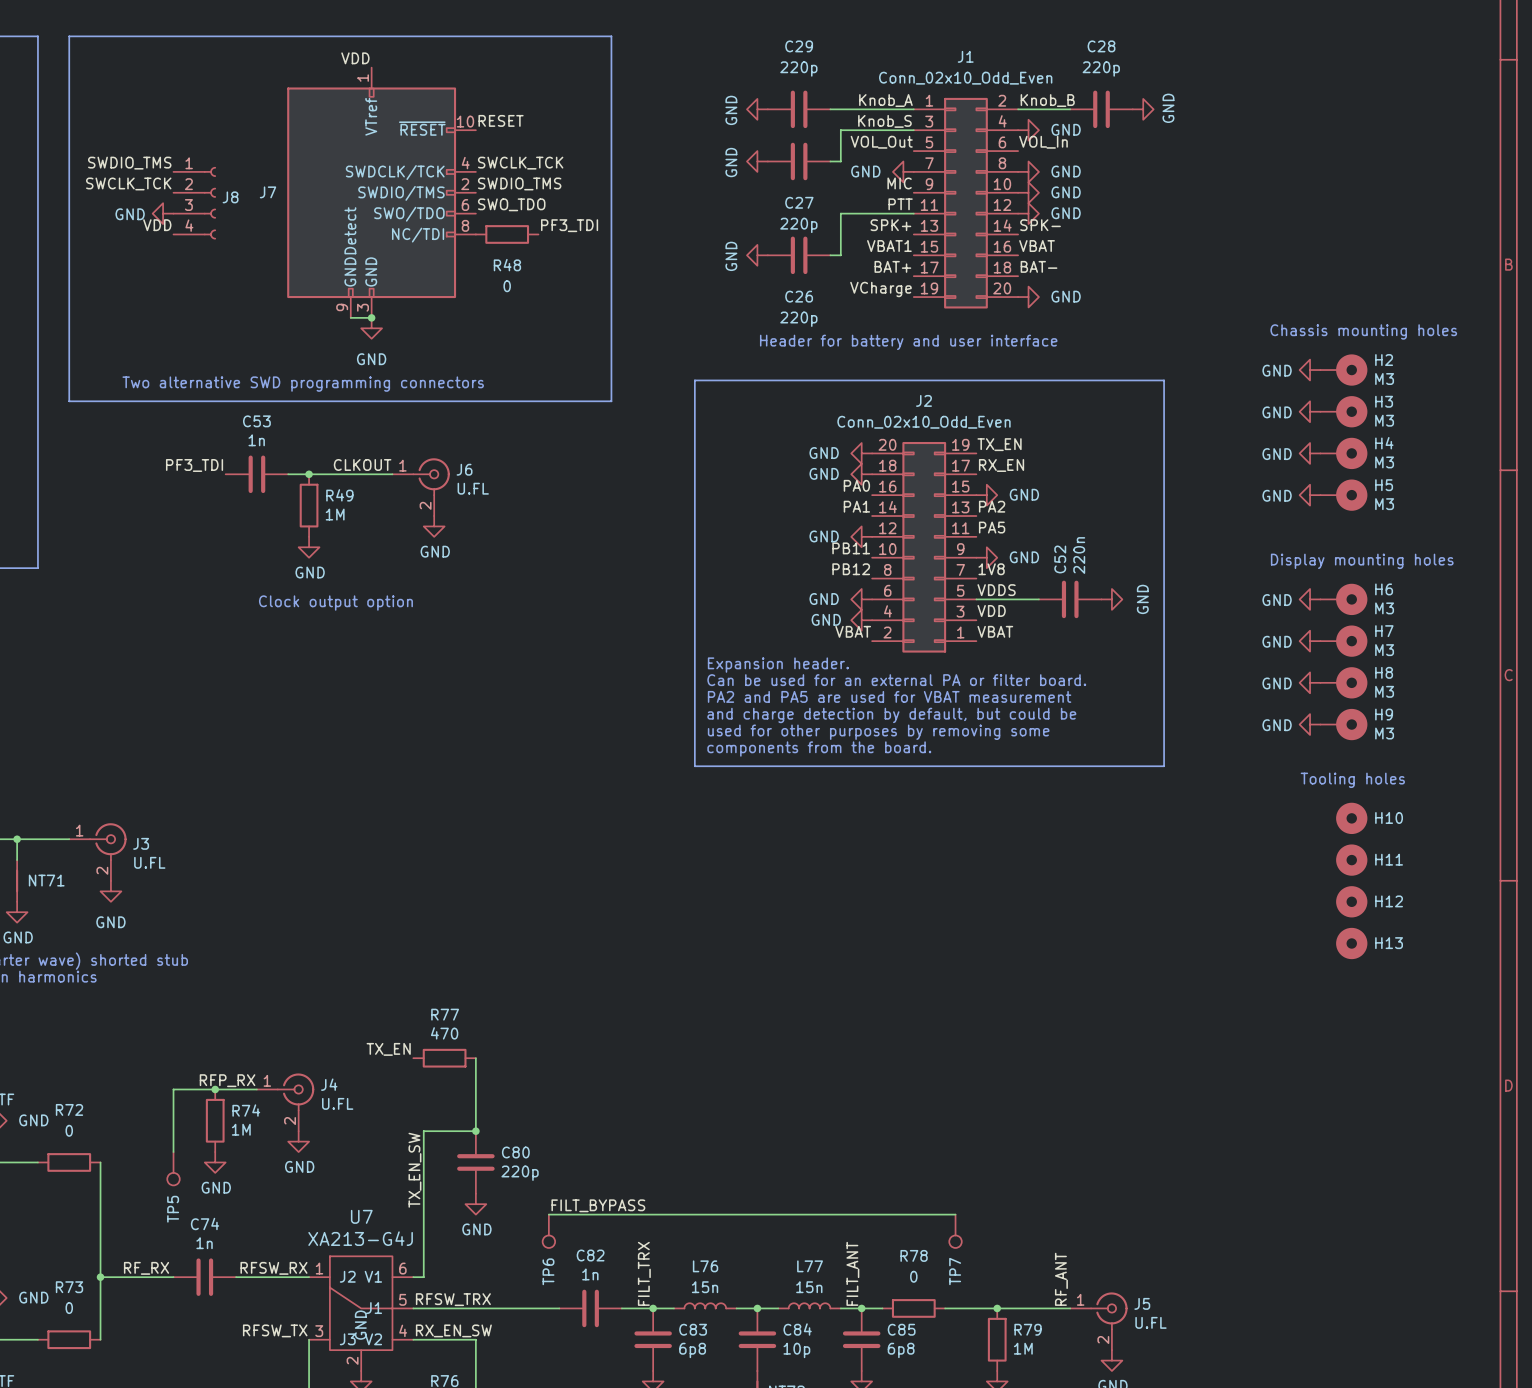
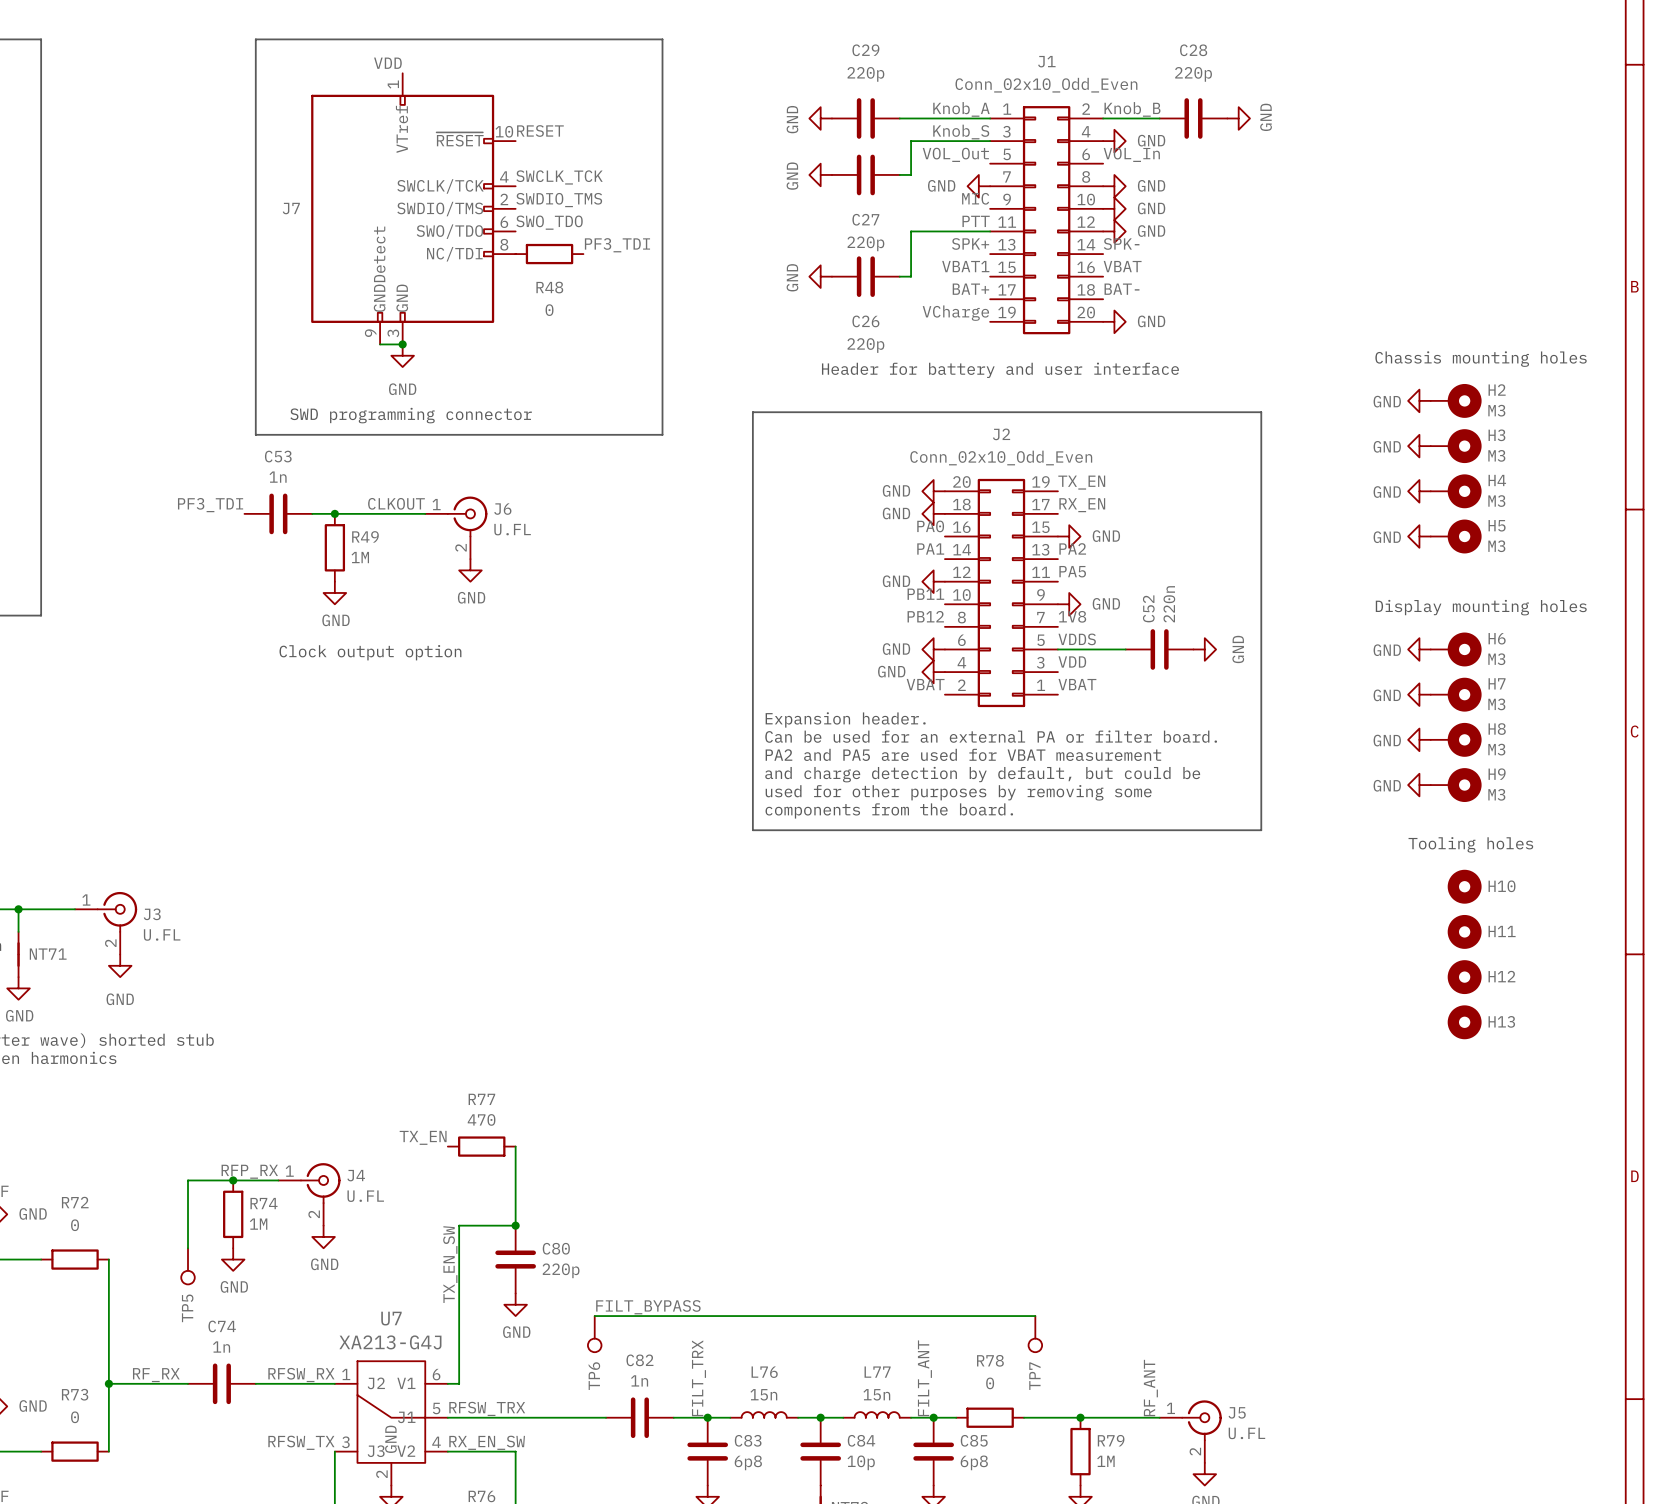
line: (236, 36) (69, 36) (69, 401) (236, 401) -> (255, 39) (255, 434)
label: SWDIO_TMS (129, 163) -> none
J7 pin name: SWDCLK/TCK (395, 172) -> SWCLK/TCK (440, 186)
label: SWCLK_TCK (128, 183) -> none
J8: (194, 203) -> none
power symbol: GND (163, 213) -> none
label: VDD (157, 225) -> none
text: Two alternative SWD programming connectors (303, 384) -> SWD programming connector (411, 415)

